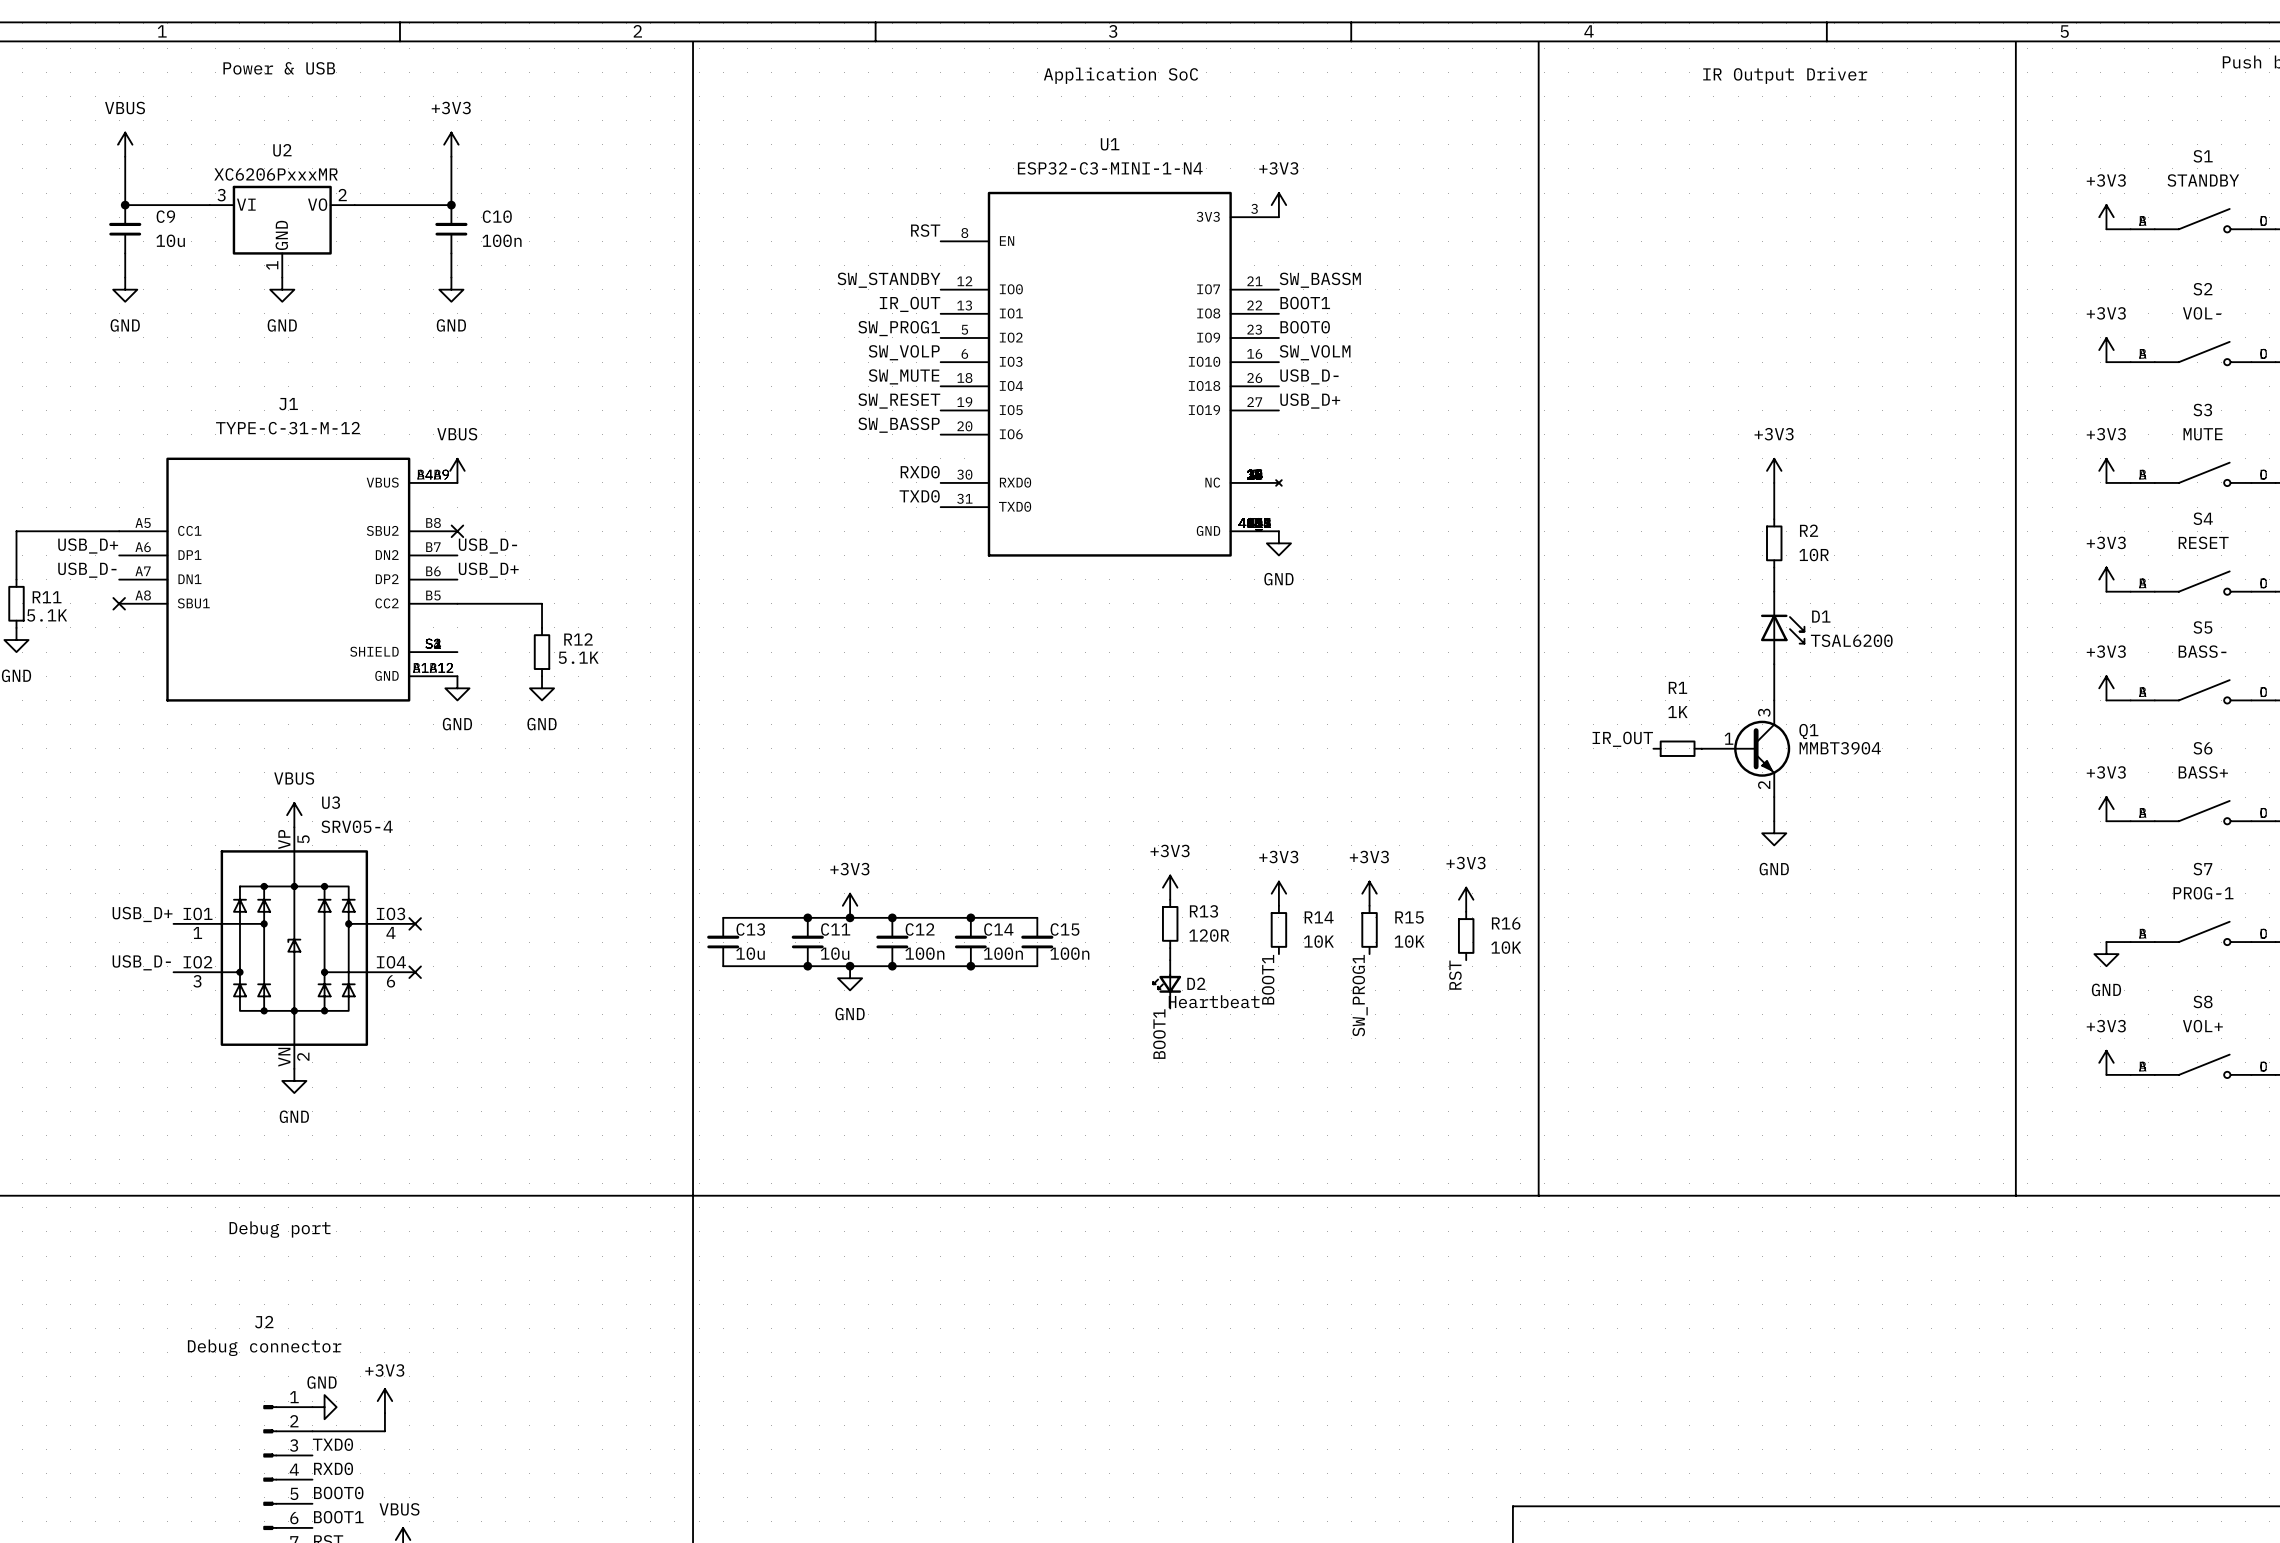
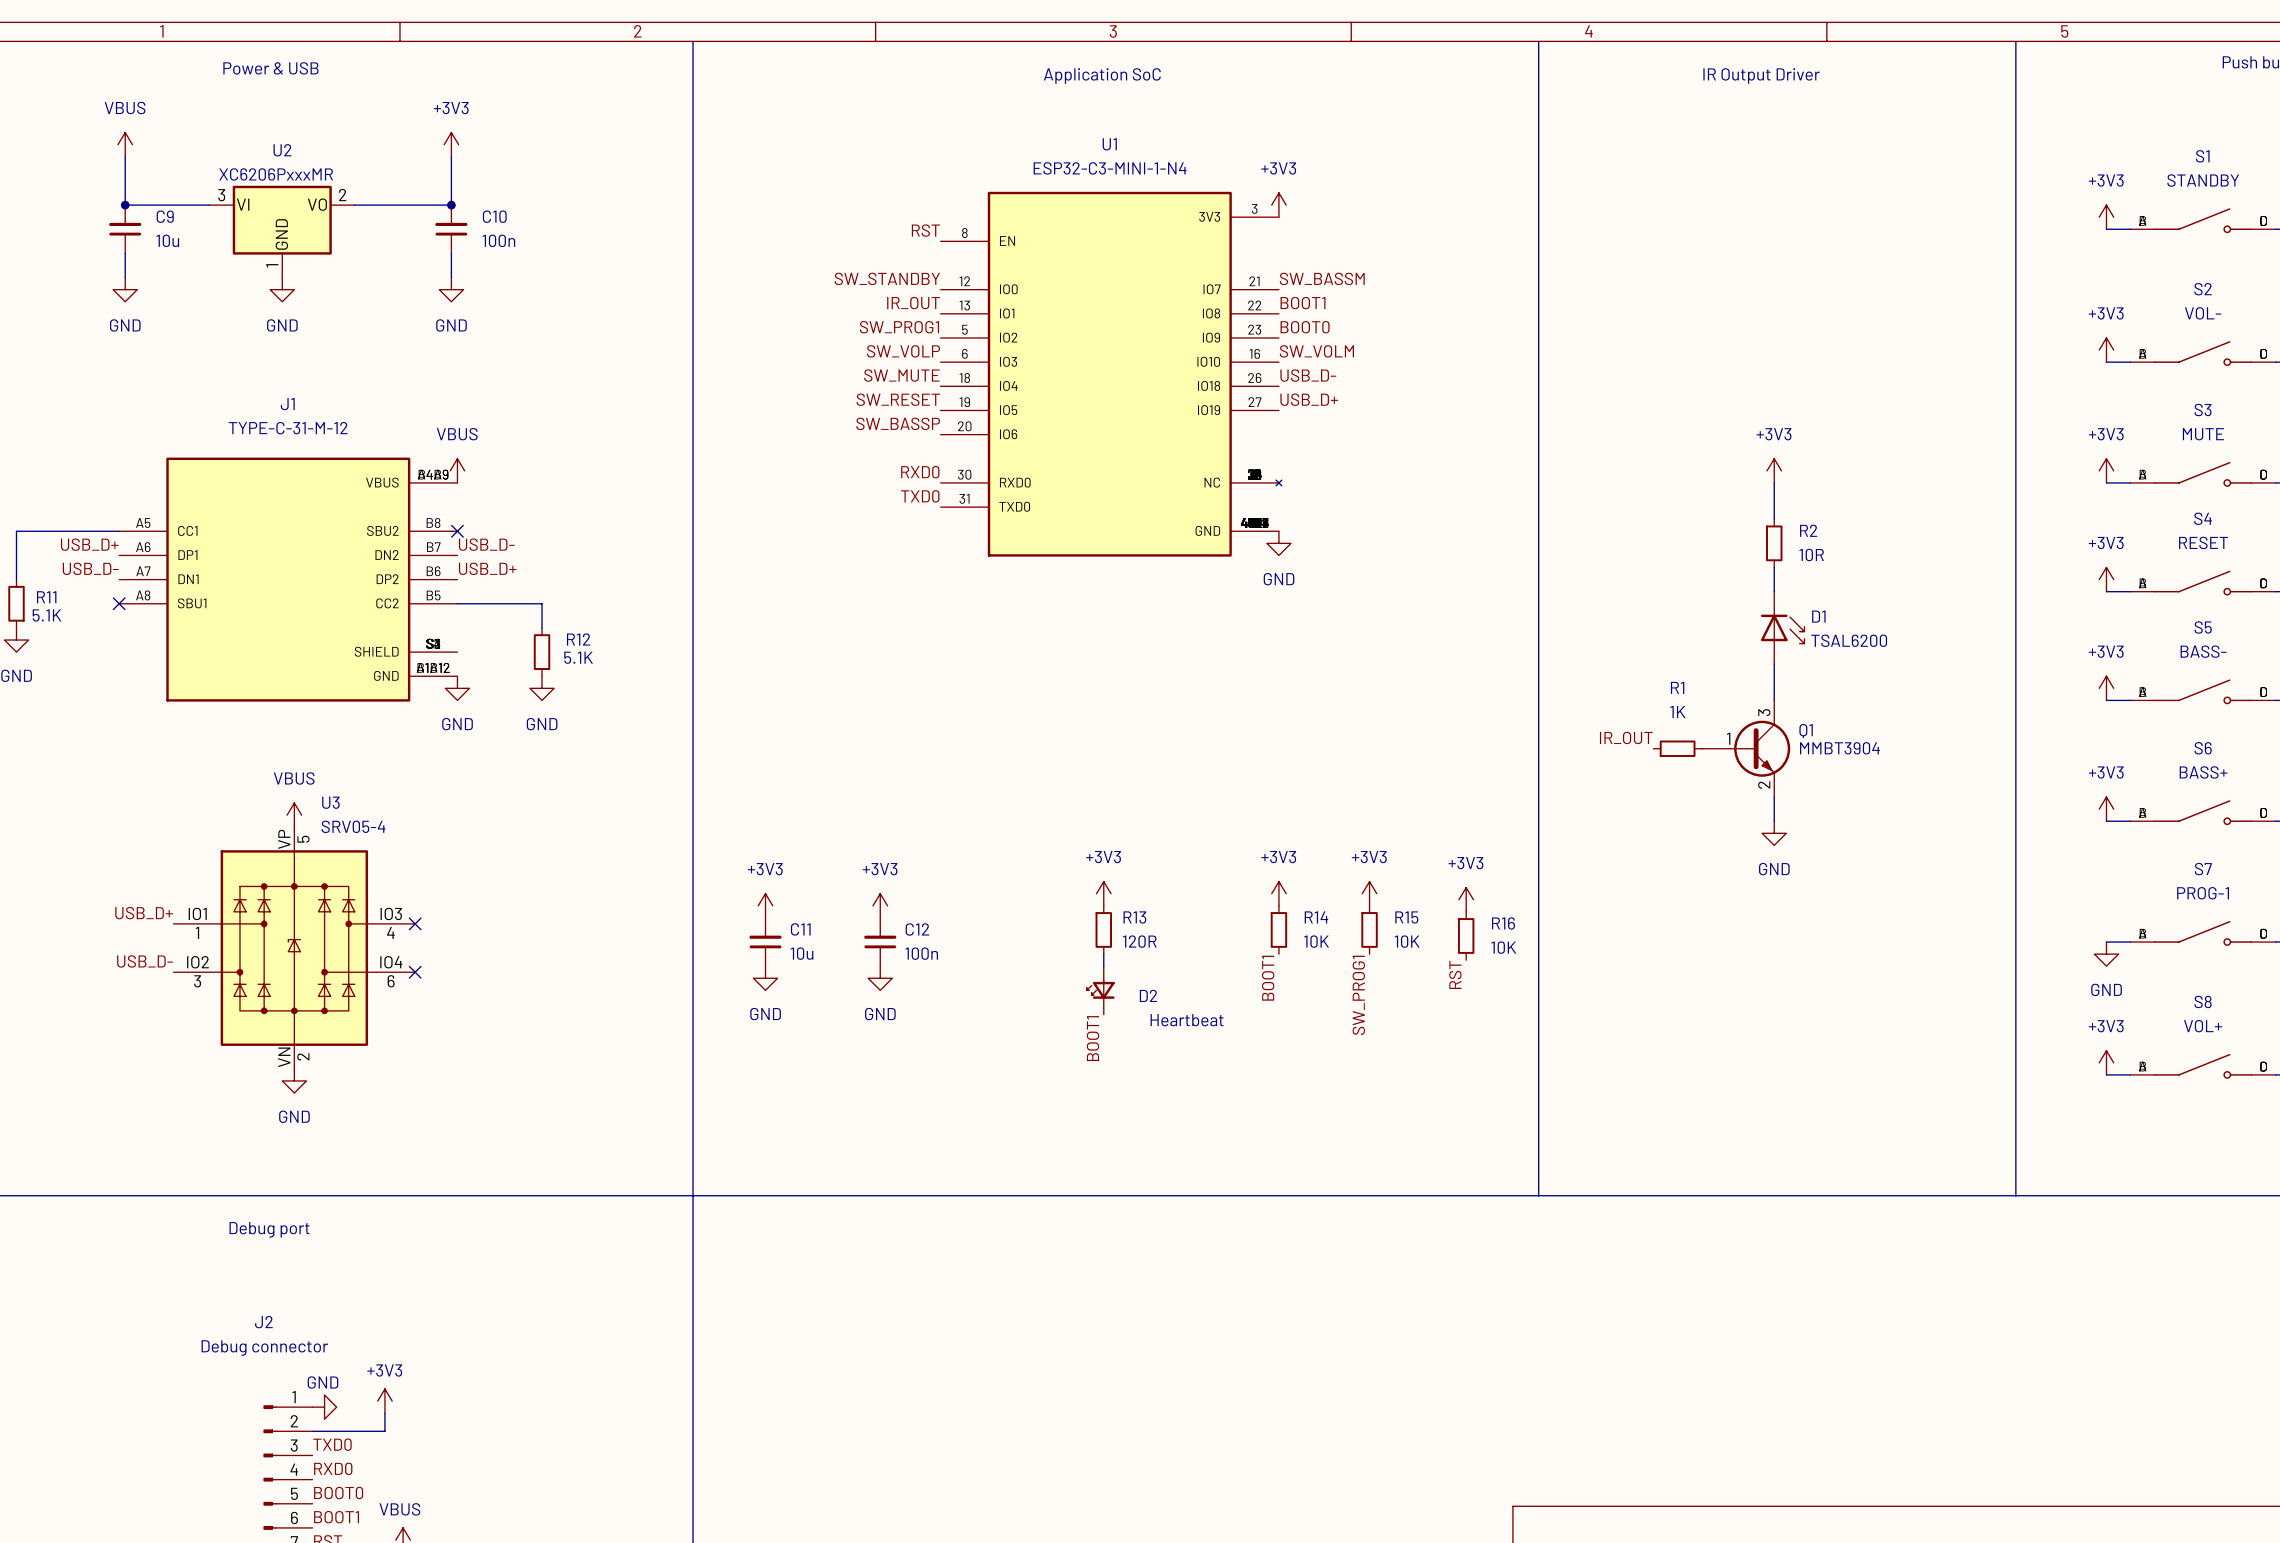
power symbol position: +3V3 (1170, 887) -> +3V3 (1103, 893)
power symbol: none -> +3V3 (765, 905)
power symbol position: +3V3 (850, 905) -> +3V3 (880, 905)
wire: (723, 917) (1037, 917) -> none
junction: (807, 917) -> none
junction: (850, 917) -> none
junction: (892, 917) -> none
junction: (970, 917) -> none
R13 position: (1170, 923) -> (1103, 929)
C11 name position: C11 (835, 929) -> C11 (800, 929)
C13: 10u (723, 942) -> none
C11 position: (807, 942) -> (765, 942)
C12 position: (892, 942) -> (880, 942)
C14: 100n (970, 942) -> none
C15: 100n (1037, 942) -> none
wire: (1170, 948) (1170, 960) -> (1103, 954) (1103, 966)
C11 value position: 10u (835, 953) -> 10u (802, 953)
wire: (723, 966) (1037, 966) -> none
junction: (807, 966) -> none
junction: (850, 966) -> none
junction: (892, 966) -> none
junction: (970, 966) -> none
power symbol: none -> GND (765, 978)
power symbol position: GND (850, 978) -> GND (880, 978)
D2 name position: D2 (1196, 983) -> D2 (1148, 995)
D2 position: (1167, 984) -> (1100, 990)
D2 value position: Heartbeat (1214, 1001) -> Heartbeat (1187, 1020)
label position: BOOT1 (1159, 1034) -> BOOT1 (1092, 1038)

